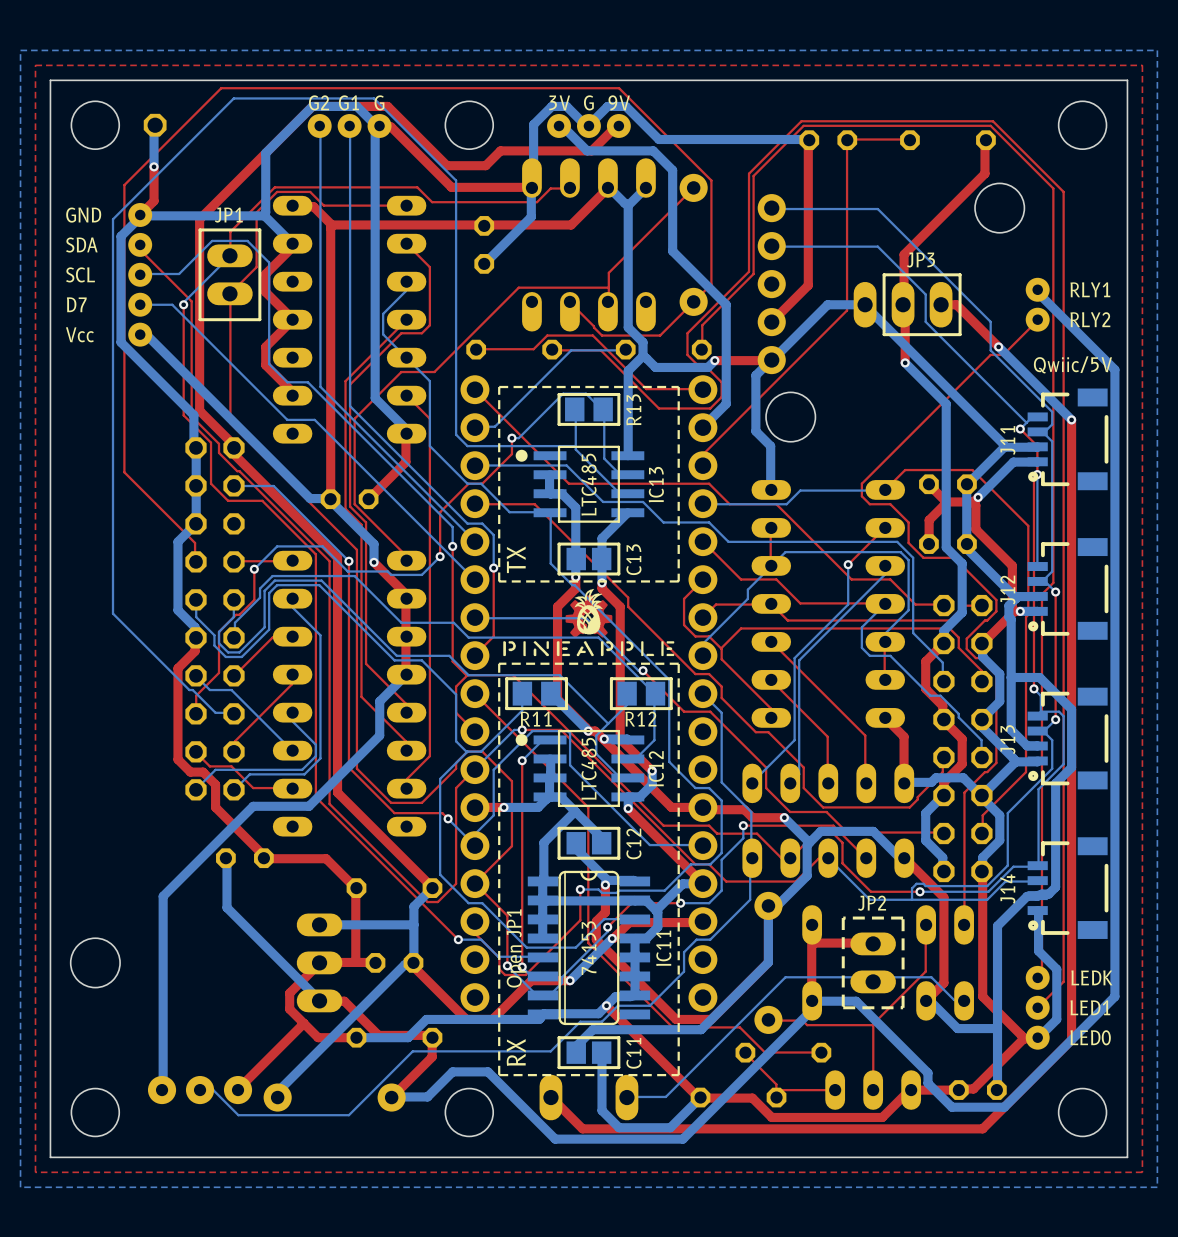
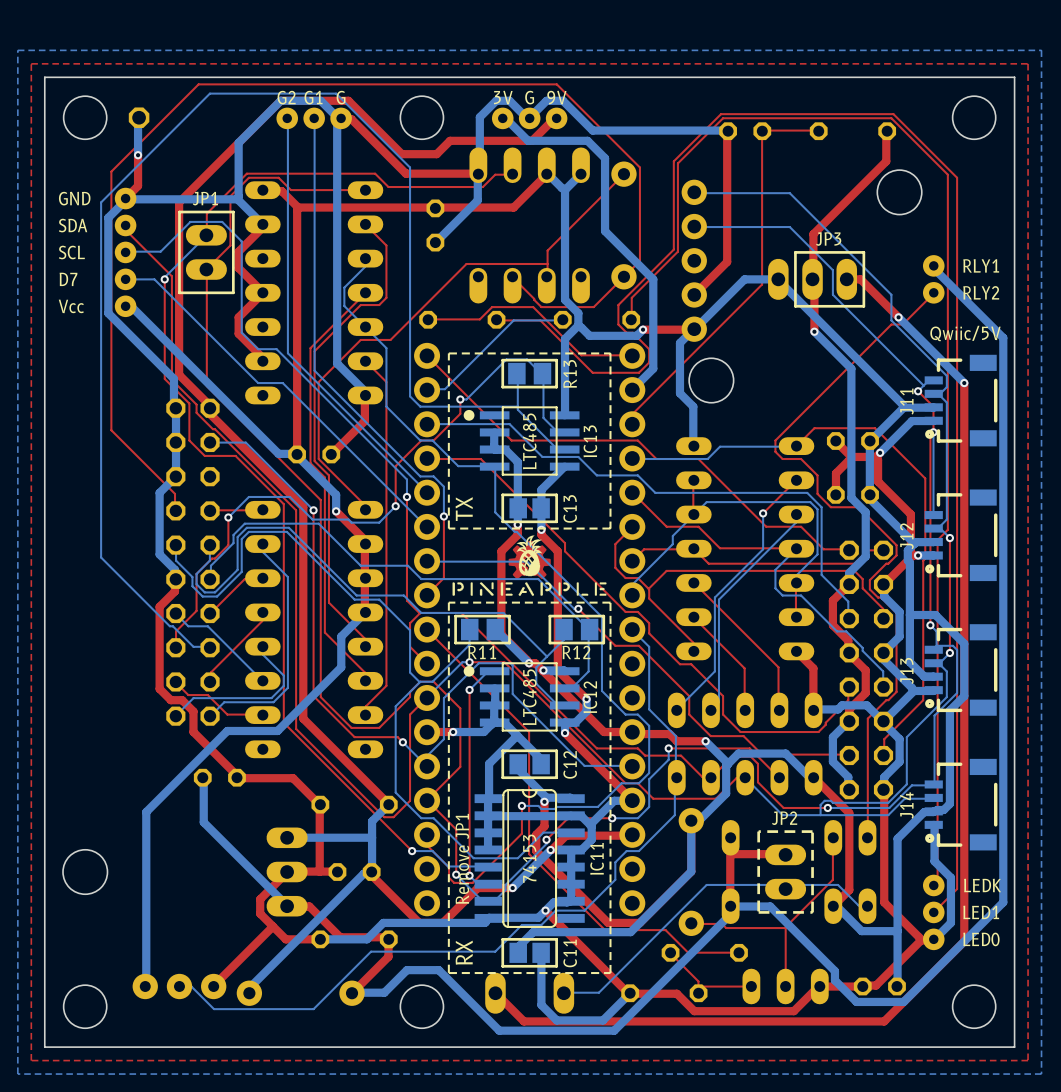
text: Open JP1 (516, 948) -> Remove JP1 (462, 858)

